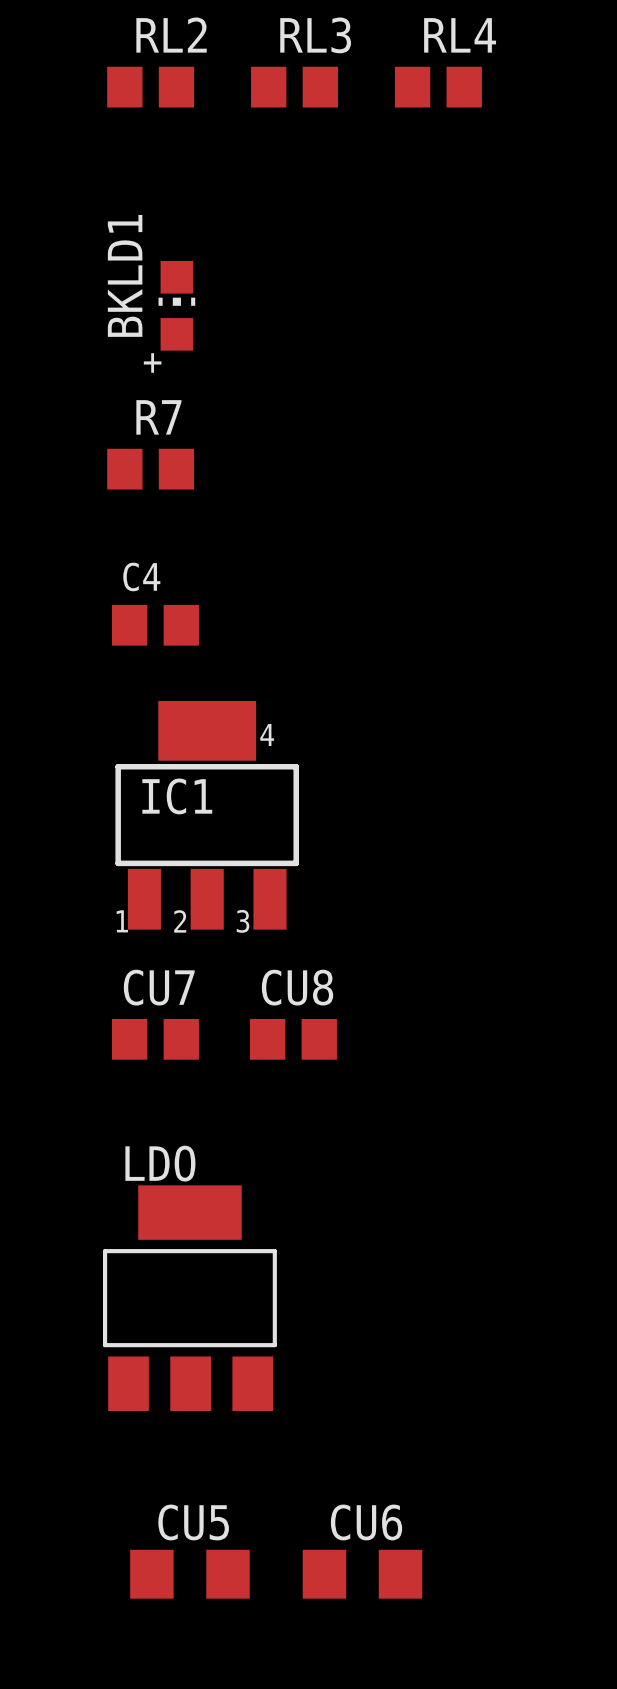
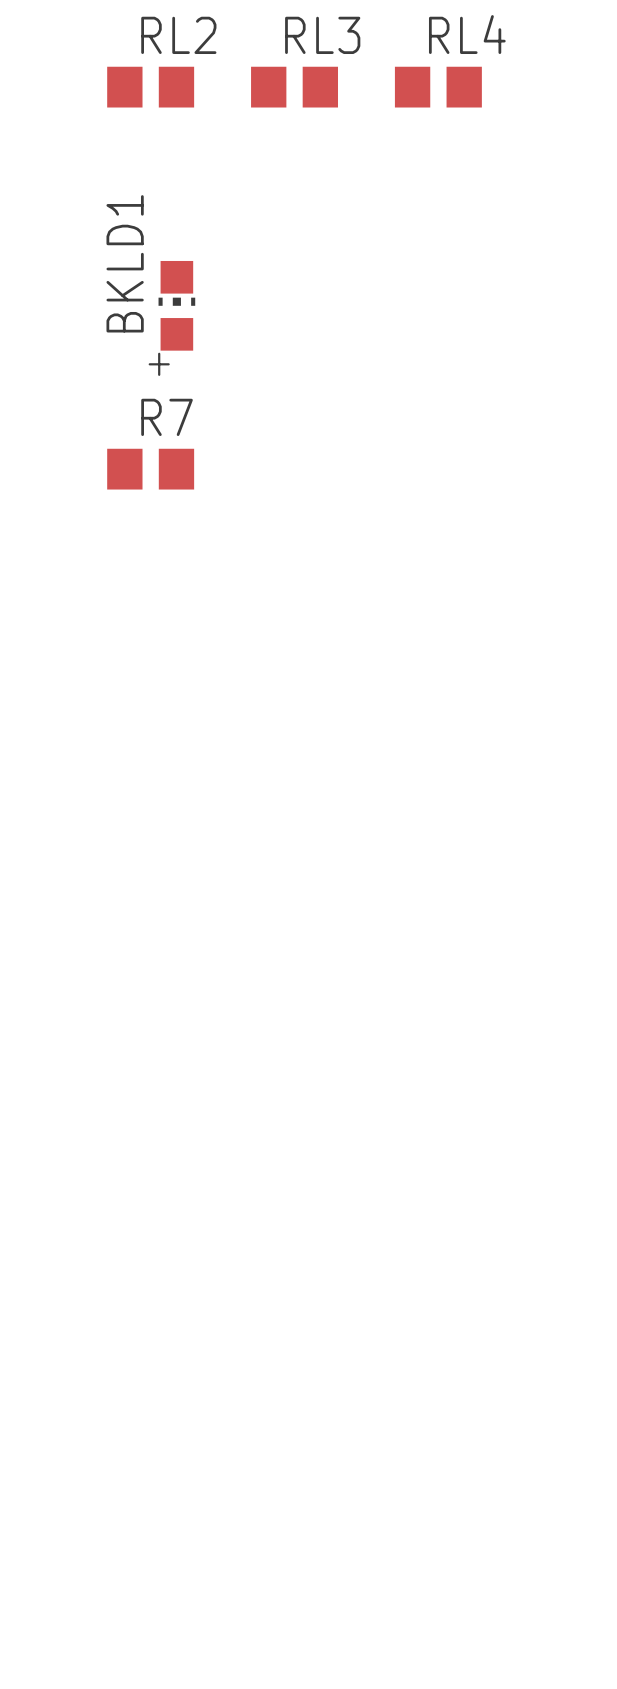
C4: (155, 625) -> none
IC1: (207, 815) -> none
CU7: (155, 1039) -> none
CU8: (293, 1039) -> none
LDO: (189, 1298) -> none
CU5: (189, 1574) -> none
CU6: (362, 1574) -> none

